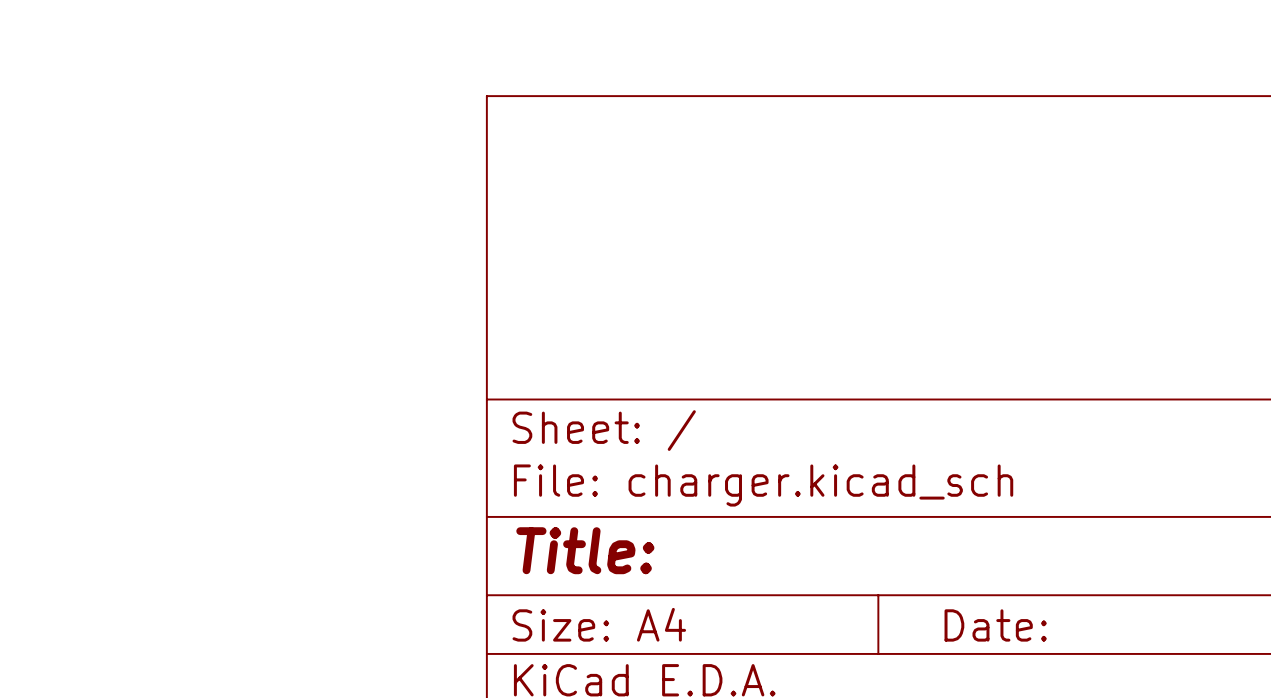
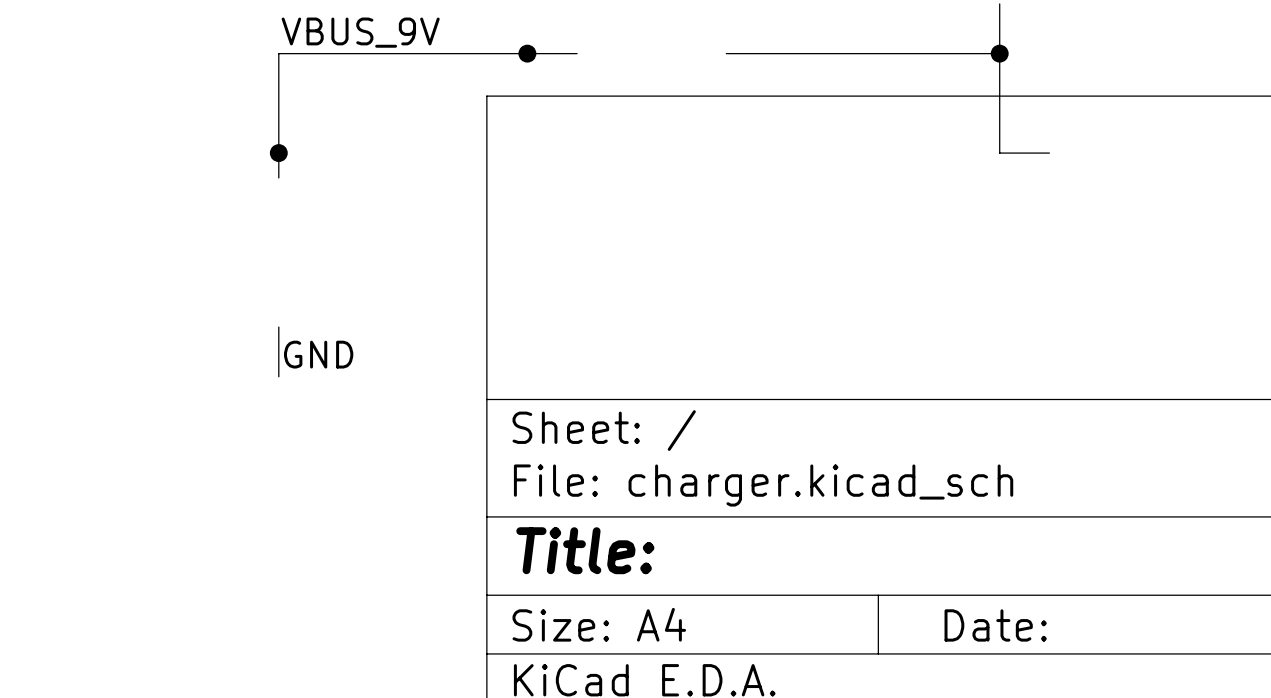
wire: none -> (999, 3) (999, 153) (1049, 153)
label: none -> VBUS_9V (360, 32)
junction: none -> (527, 53)
wire: none -> (577, 53) (278, 53) (278, 177)
wire: none -> (726, 53) (999, 53)
junction: none -> (999, 53)
junction: none -> (278, 153)
wire: none -> (278, 327) (278, 376)
label: none -> GND (318, 354)

